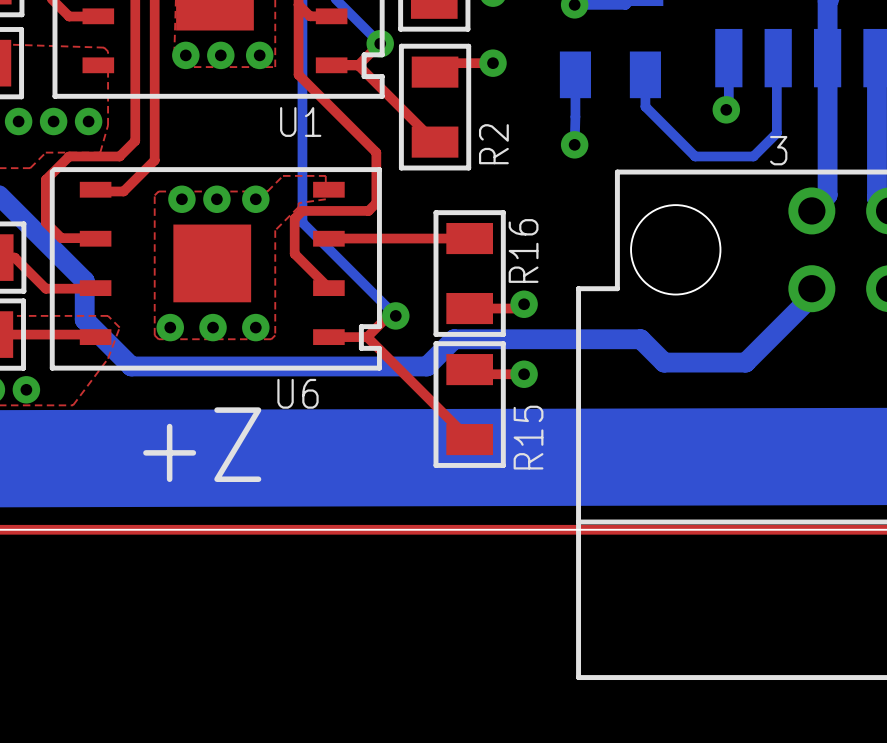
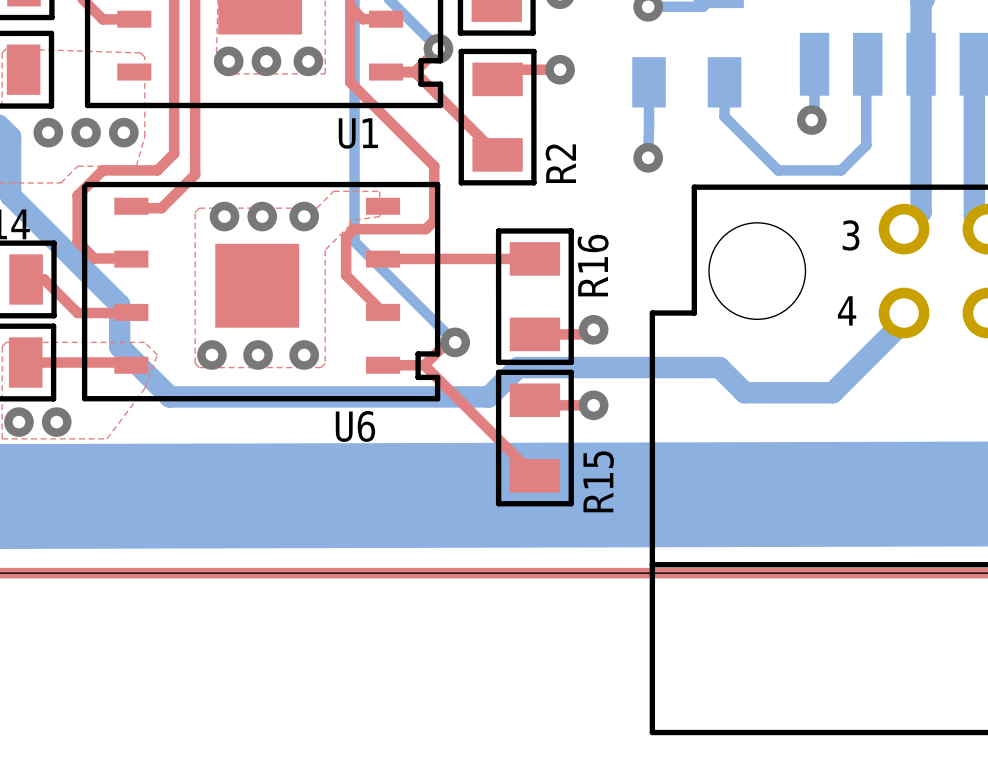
part text position: 3 (778, 150) -> 3 (851, 235)
part text: none -> 4 (847, 310)
text: +Z (202, 444) -> none

